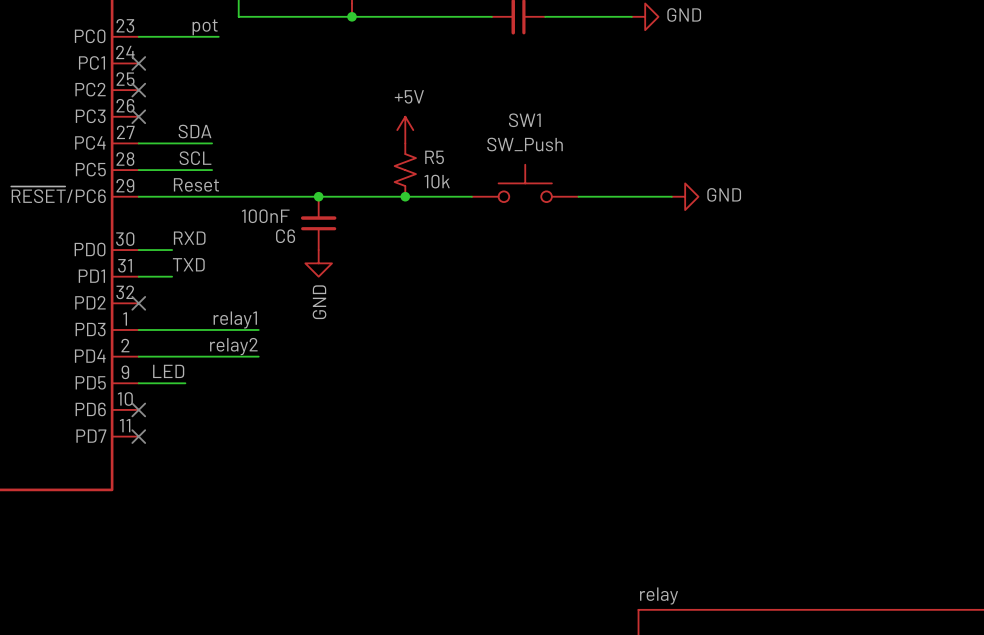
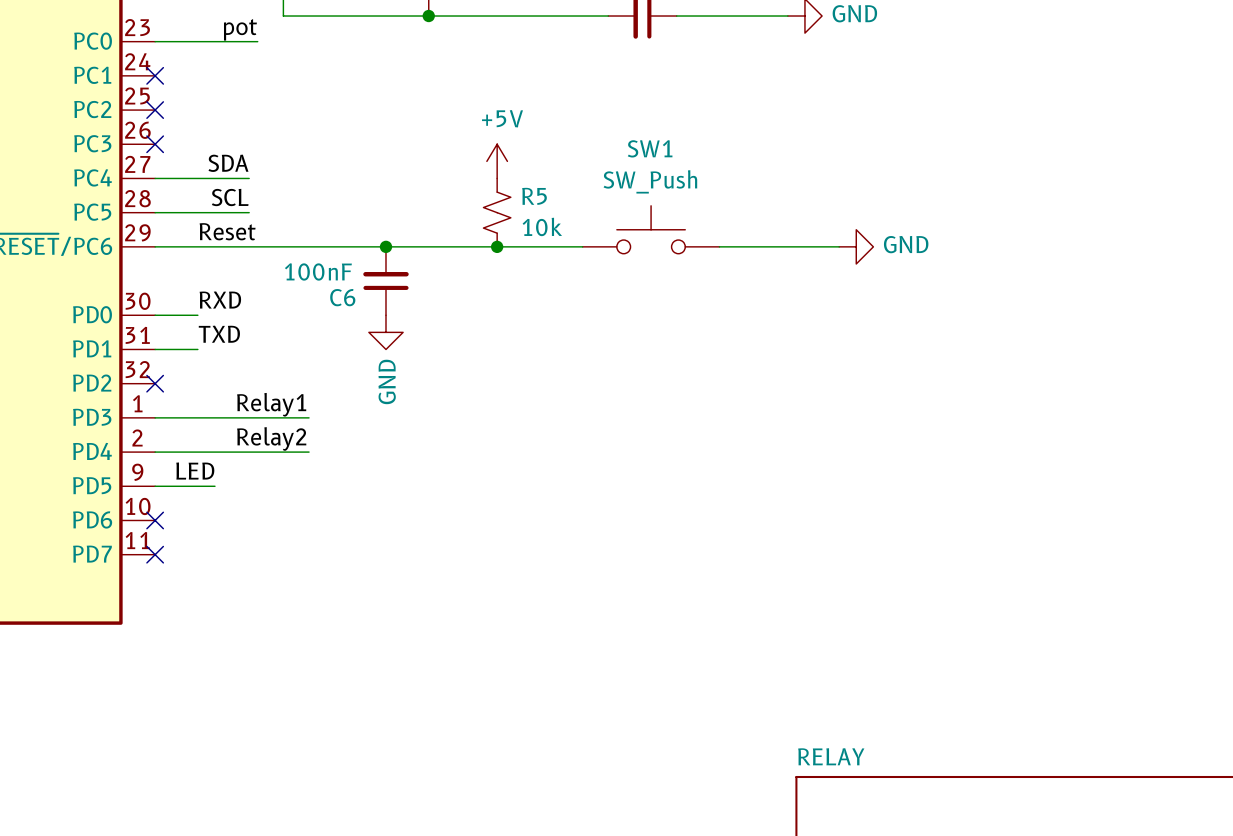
label: relay1 (235, 320) -> Relay1 (271, 404)
label: relay2 (233, 346) -> Relay2 (271, 438)
sheet relay name: relay (659, 595) -> RELAY (831, 756)

